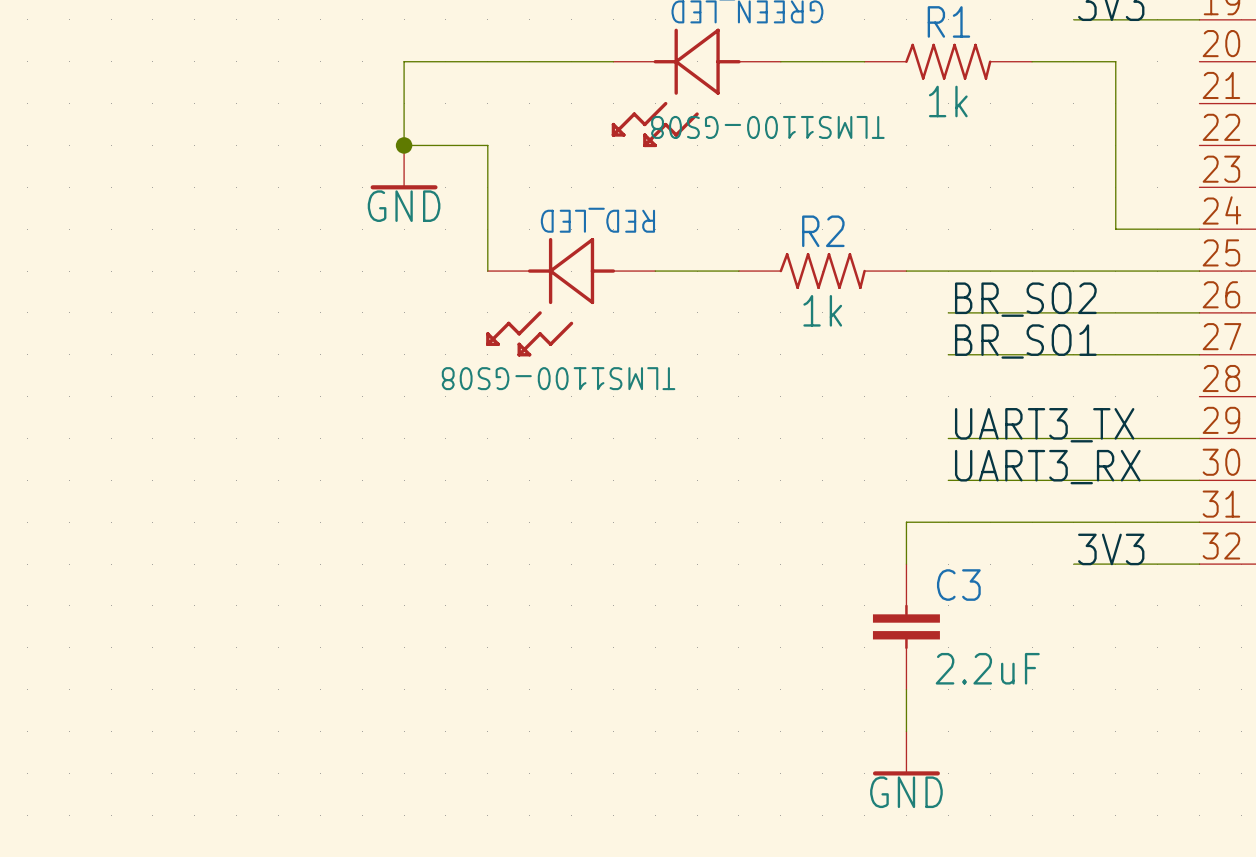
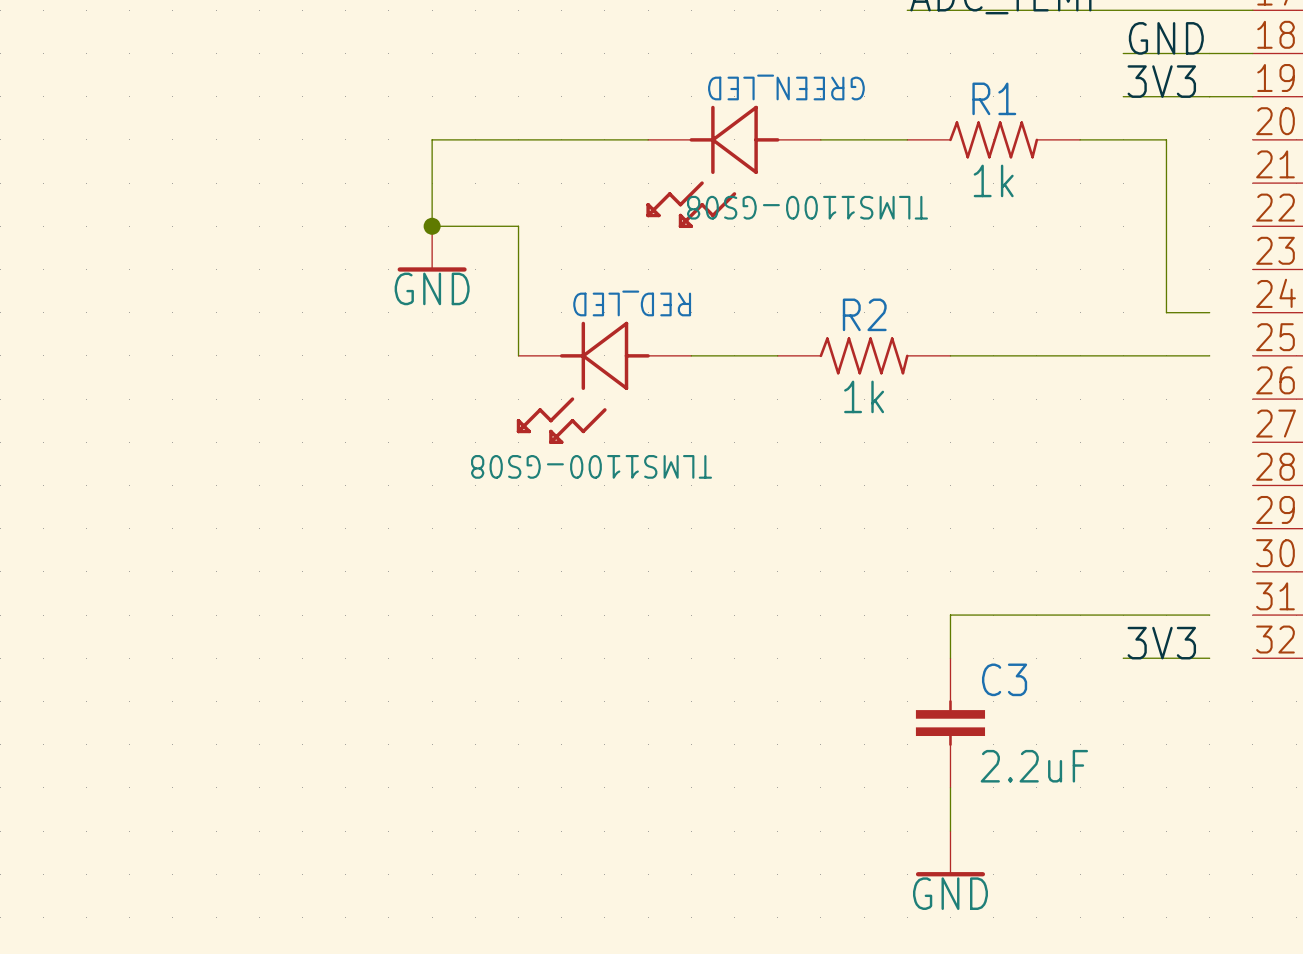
wire: (1157, 229) (1199, 229) -> none
wire: (1157, 271) (1199, 271) -> none
label: BR_SO2 (1025, 299) -> none
wire: (948, 312) (1199, 312) -> none
label: BR_SO1 (1025, 341) -> none
wire: (948, 354) (1199, 354) -> none
label: UART3_TX (1044, 425) -> none
wire: (948, 438) (1199, 438) -> none
label: UART3_RX (1047, 467) -> none
wire: (948, 480) (1199, 480) -> none
wire: (1157, 522) (1199, 522) -> none
wire: (1157, 564) (1199, 564) -> none

